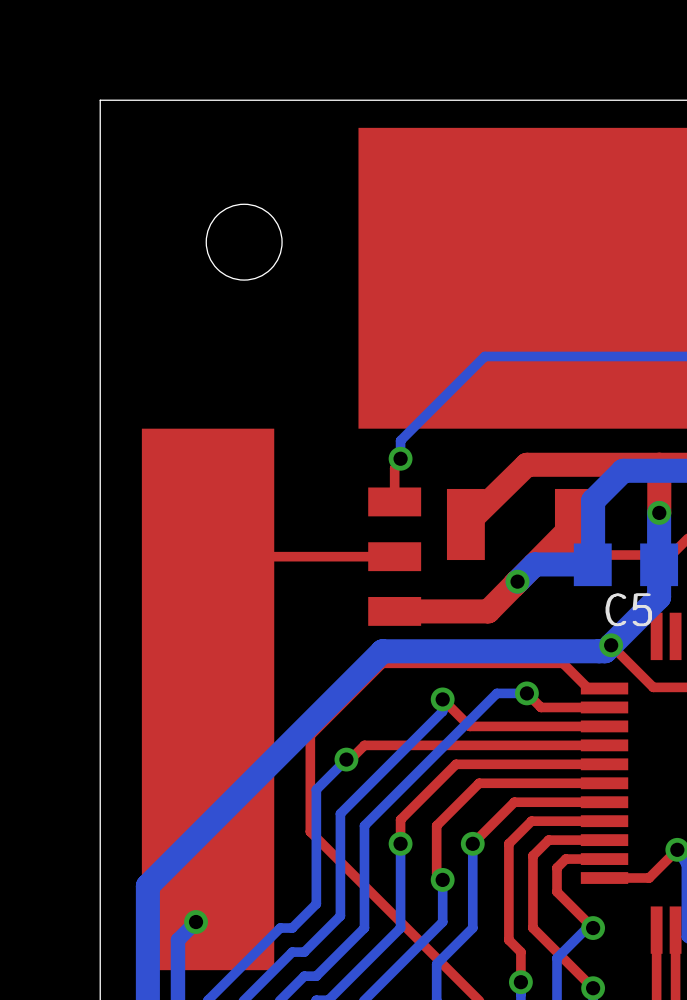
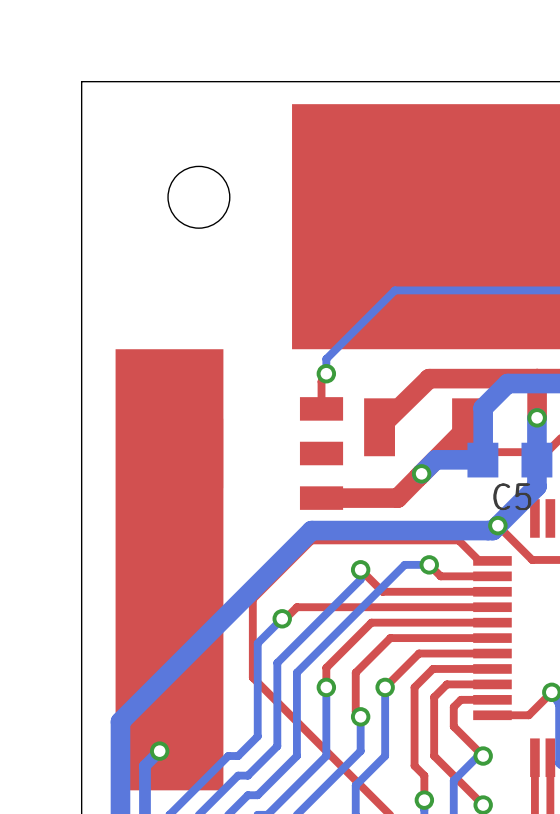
top track: (394, 556) (247, 556) -> none

